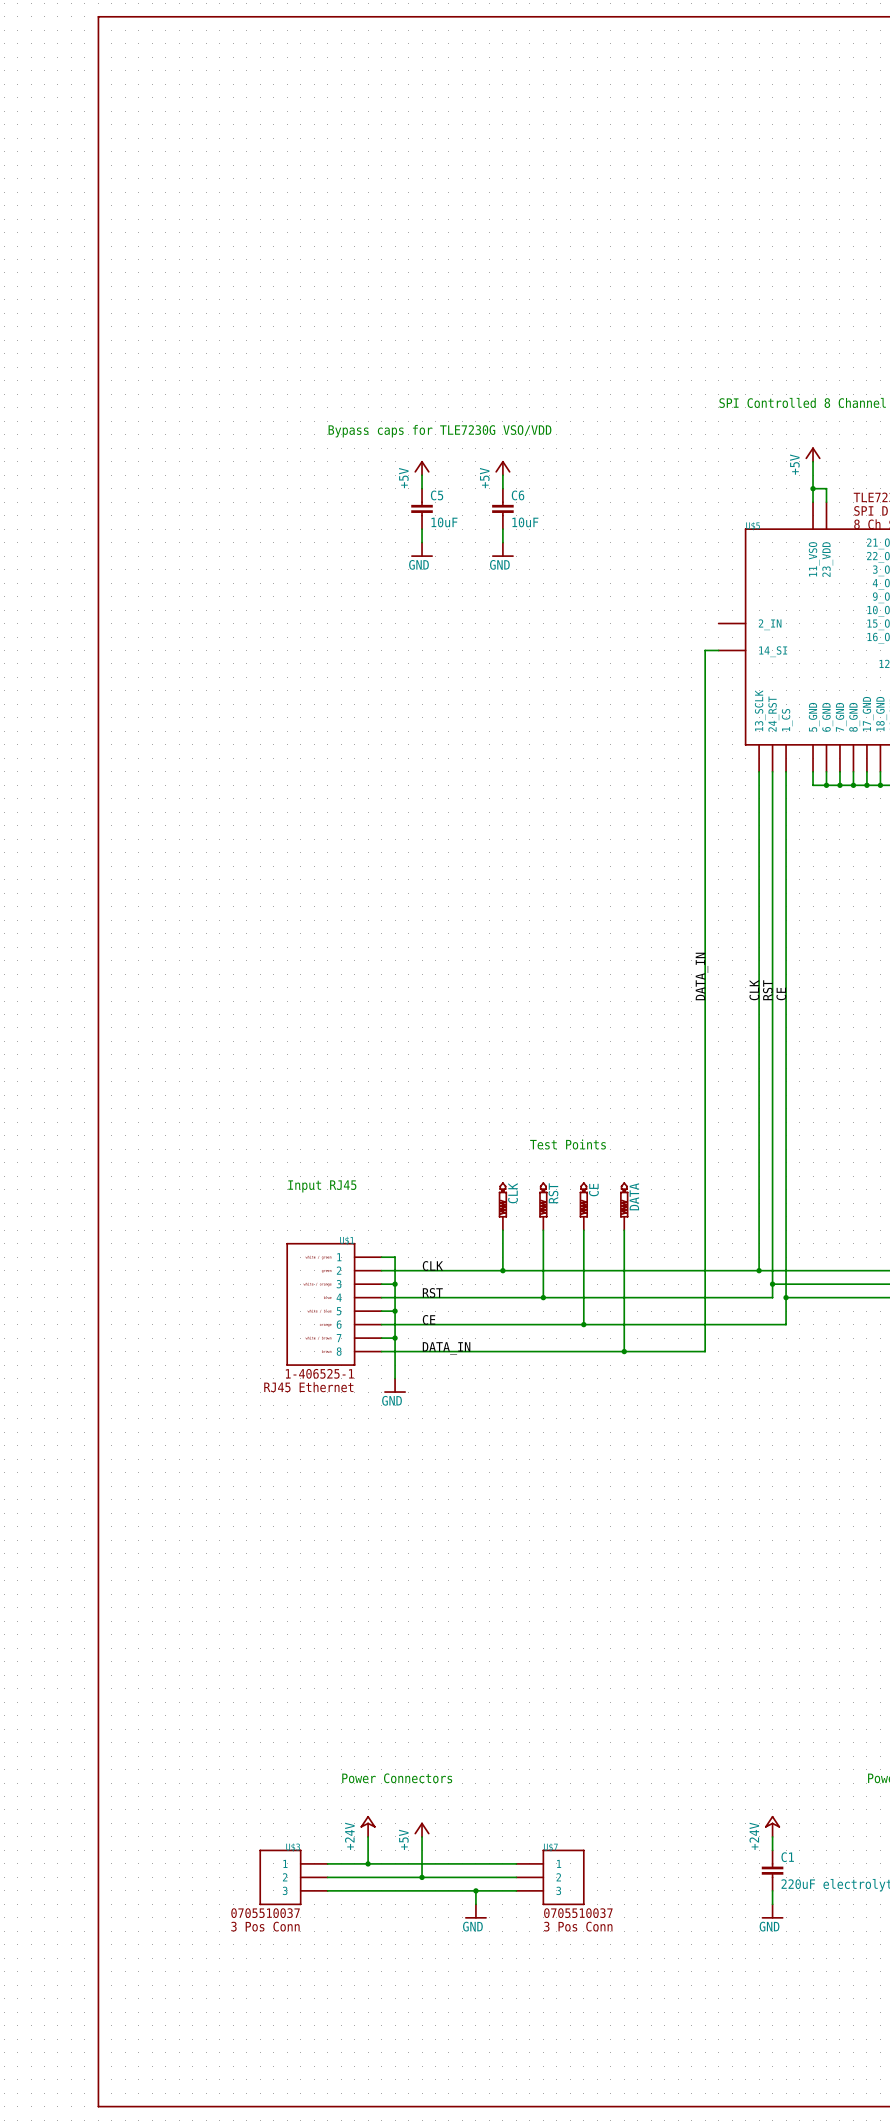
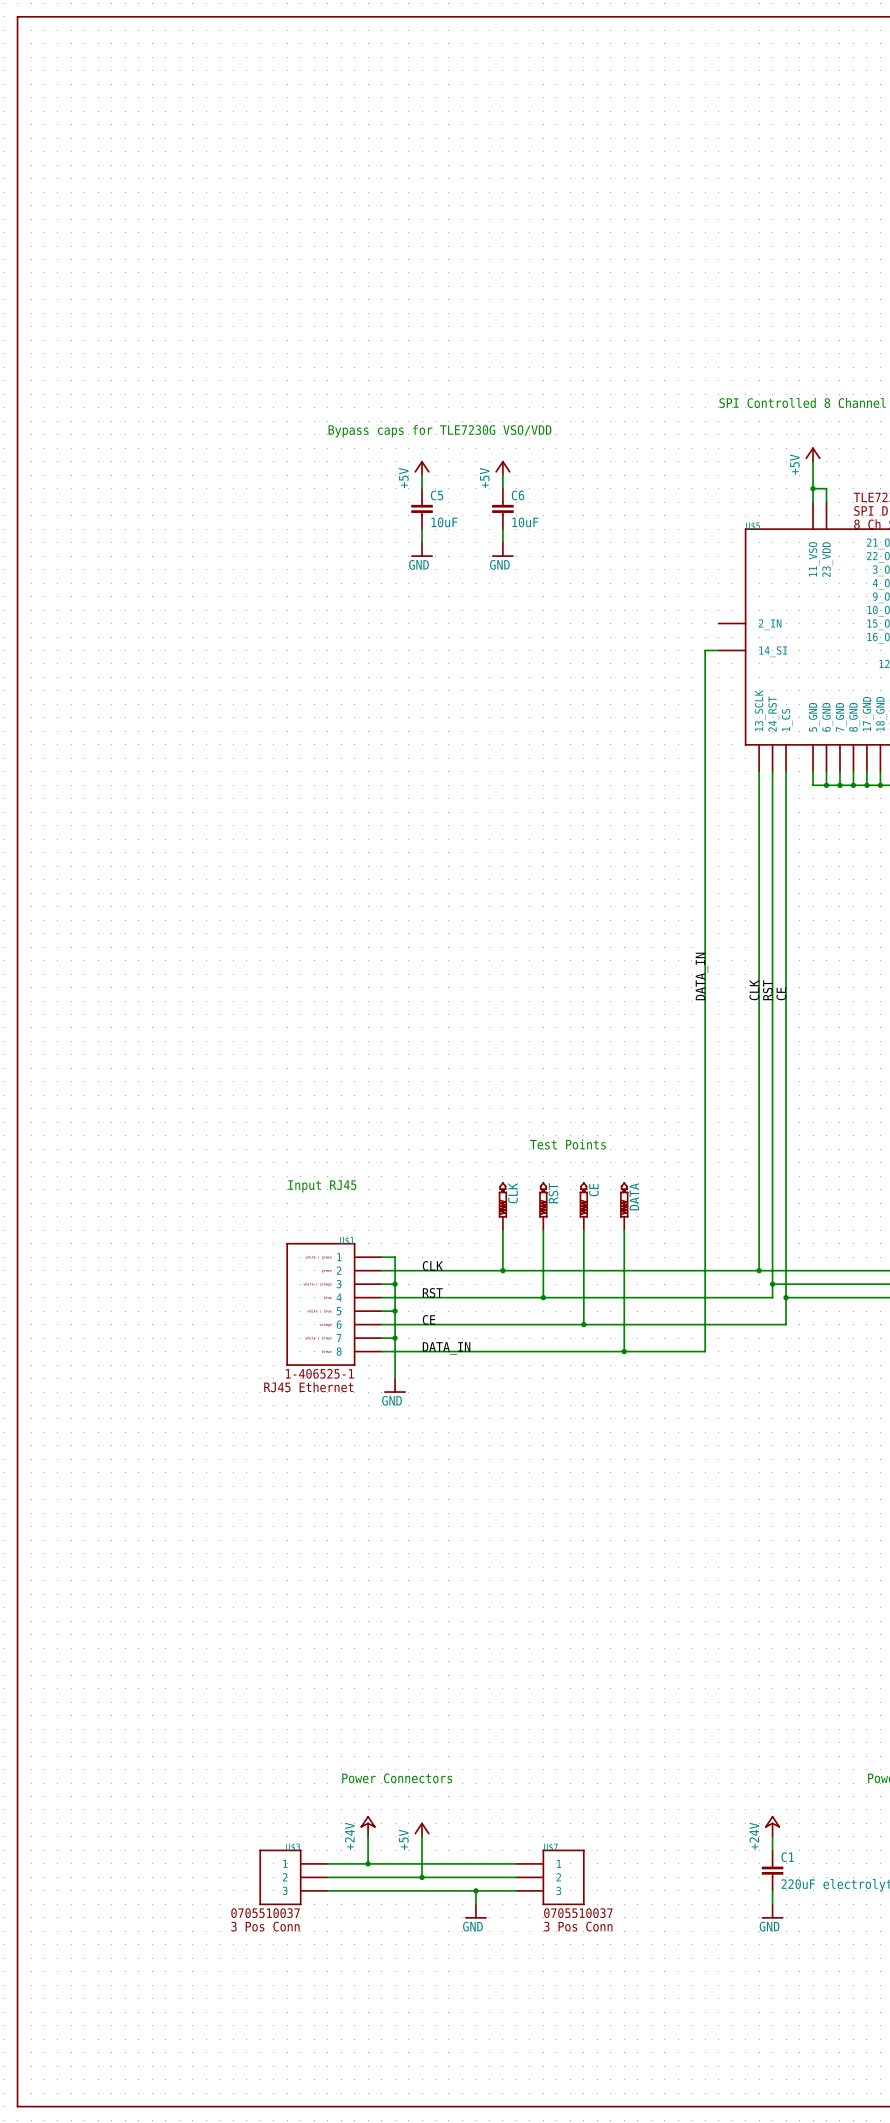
line: (98, 16) (98, 2106) -> (98, 16) (17, 16) (17, 2106) (98, 2106)

